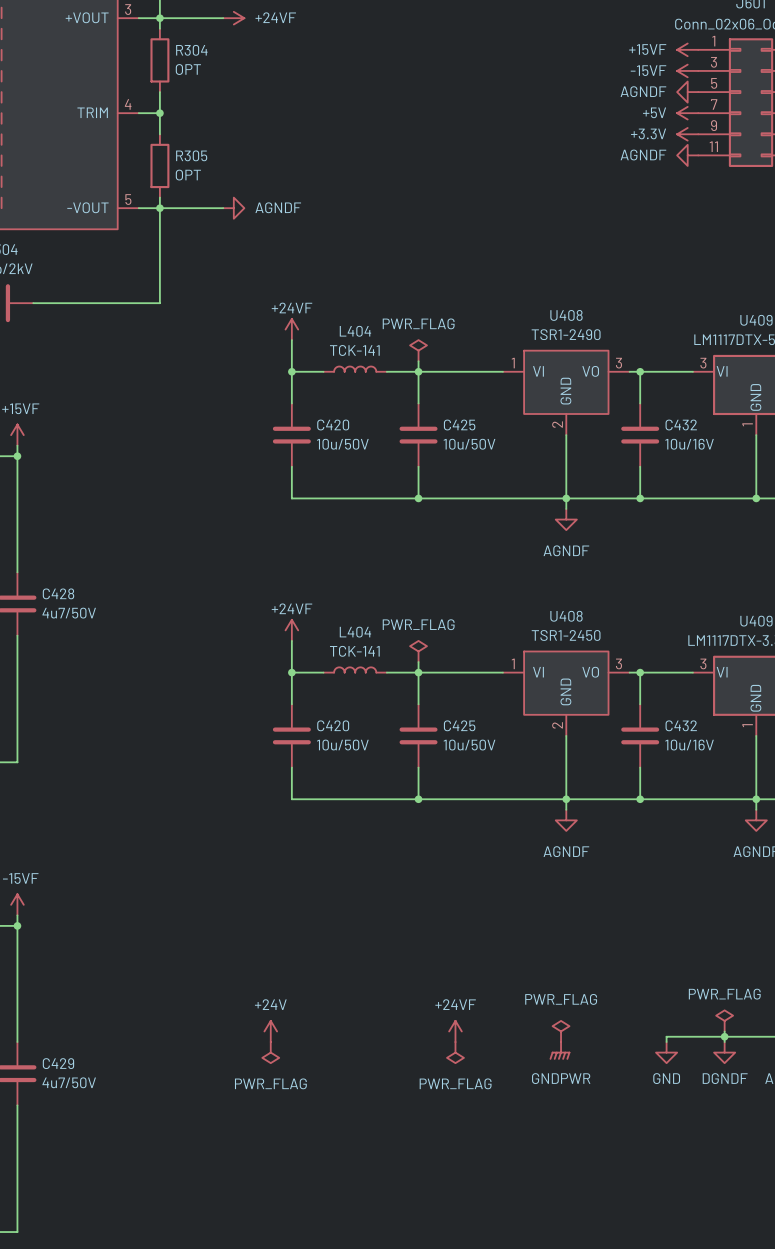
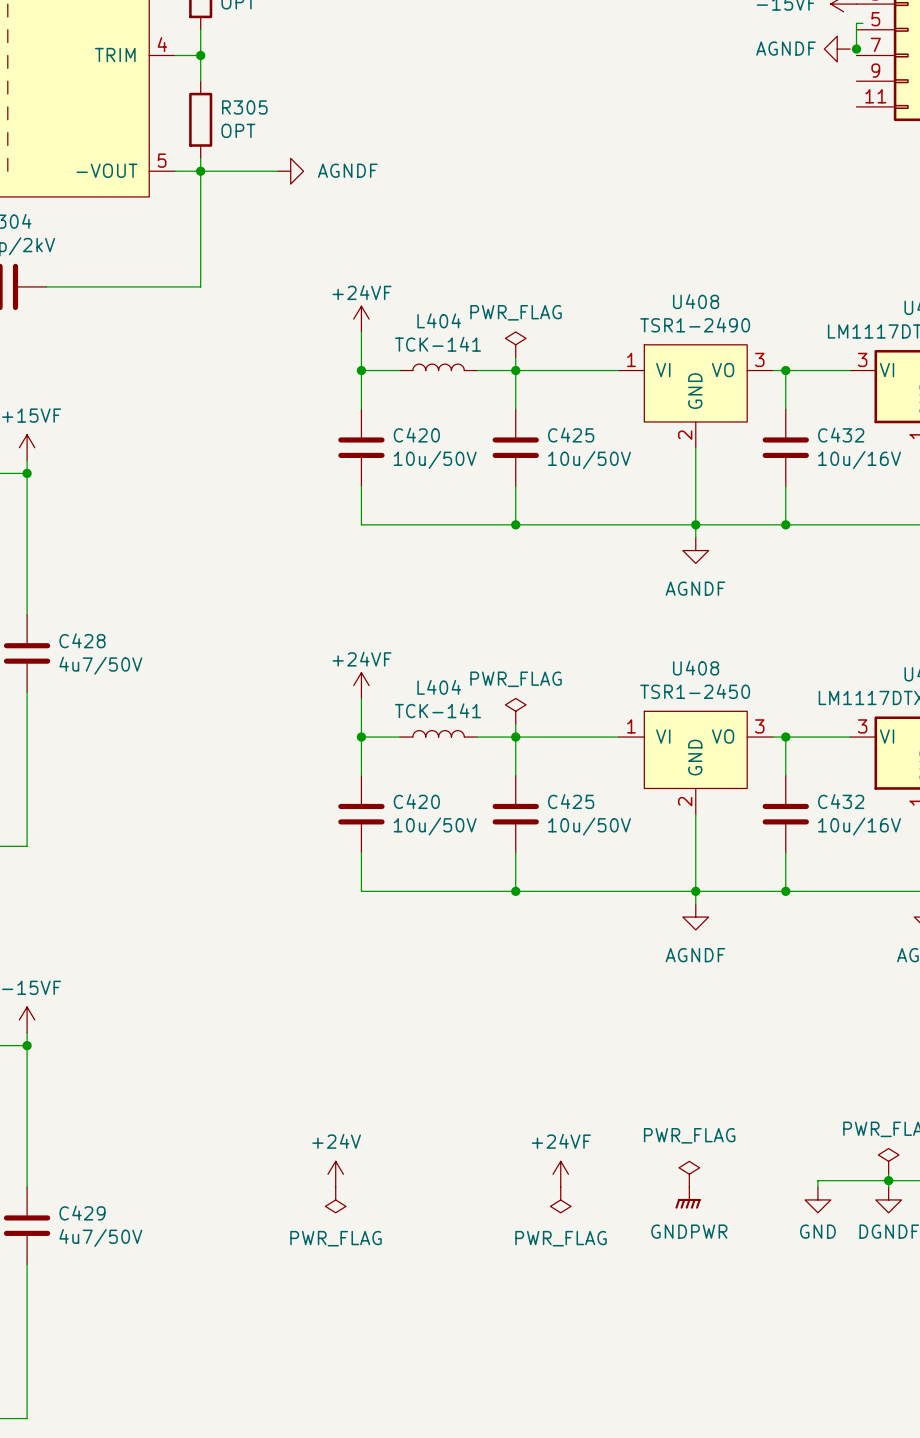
wire: none -> (862, 23) (856, 23) (856, 49)
power symbol: AGNDF (687, 92) -> none
junction: none -> (856, 49)
power symbol: +5V (687, 113) -> AGNDF (837, 49)
power symbol: +3.3V (687, 134) -> none
power symbol: AGNDF (687, 155) -> none

